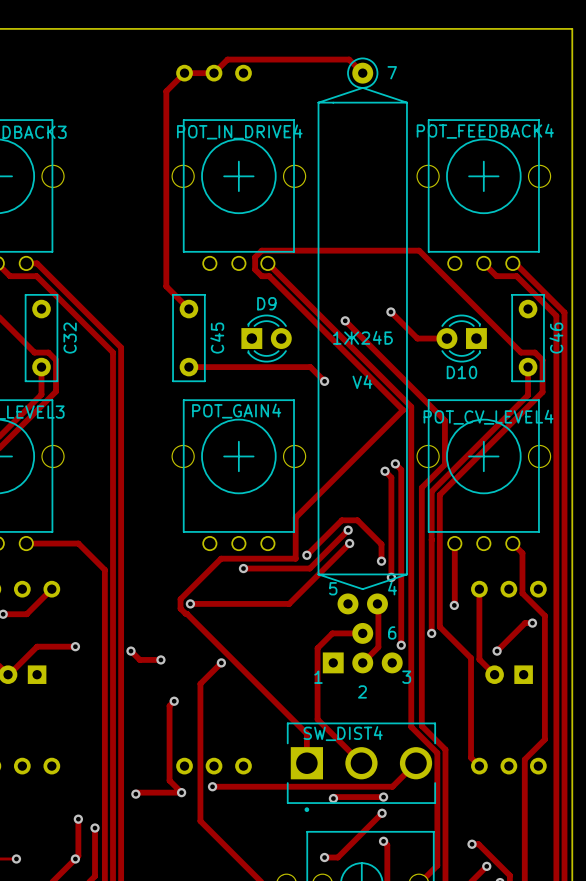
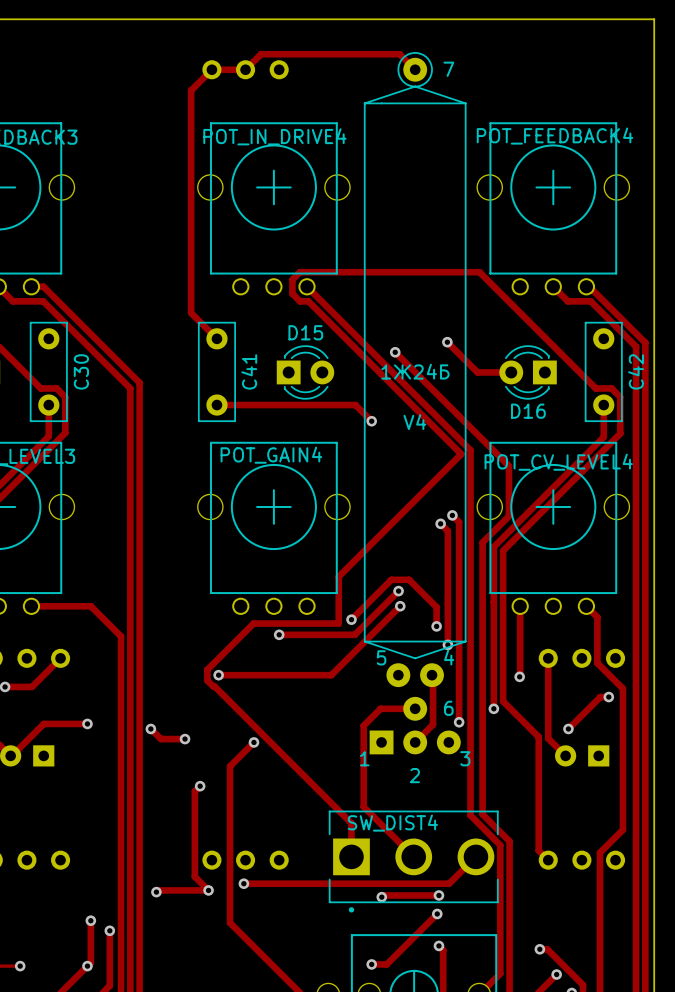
D9 name: D9 (266, 303) -> D15 (305, 332)
C32 name: C32 (70, 338) -> C30 (81, 371)
C45 name: C45 (217, 338) -> C41 (249, 371)
C46 name: C46 (556, 338) -> C42 (636, 371)
D10 name: D10 (461, 372) -> D16 (528, 411)

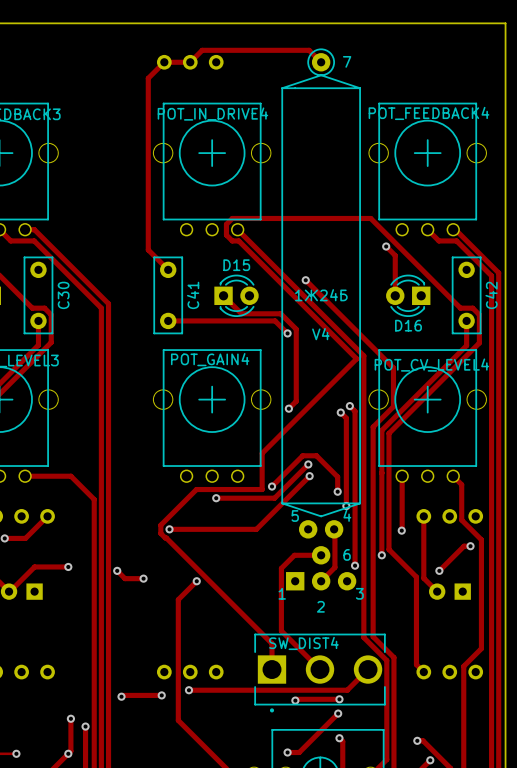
track: (447, 342) (477, 372) (511, 372) -> (386, 246) (395, 255) (395, 295)
via position: (447, 342) -> (386, 246)
track: none -> (223, 295) (241, 313) (280, 313) (296, 329) (296, 401) (288, 408)
via: none -> (288, 408)
track: (200, 786) (194, 791) (194, 876) (208, 890) -> none
via: (200, 786) -> none

